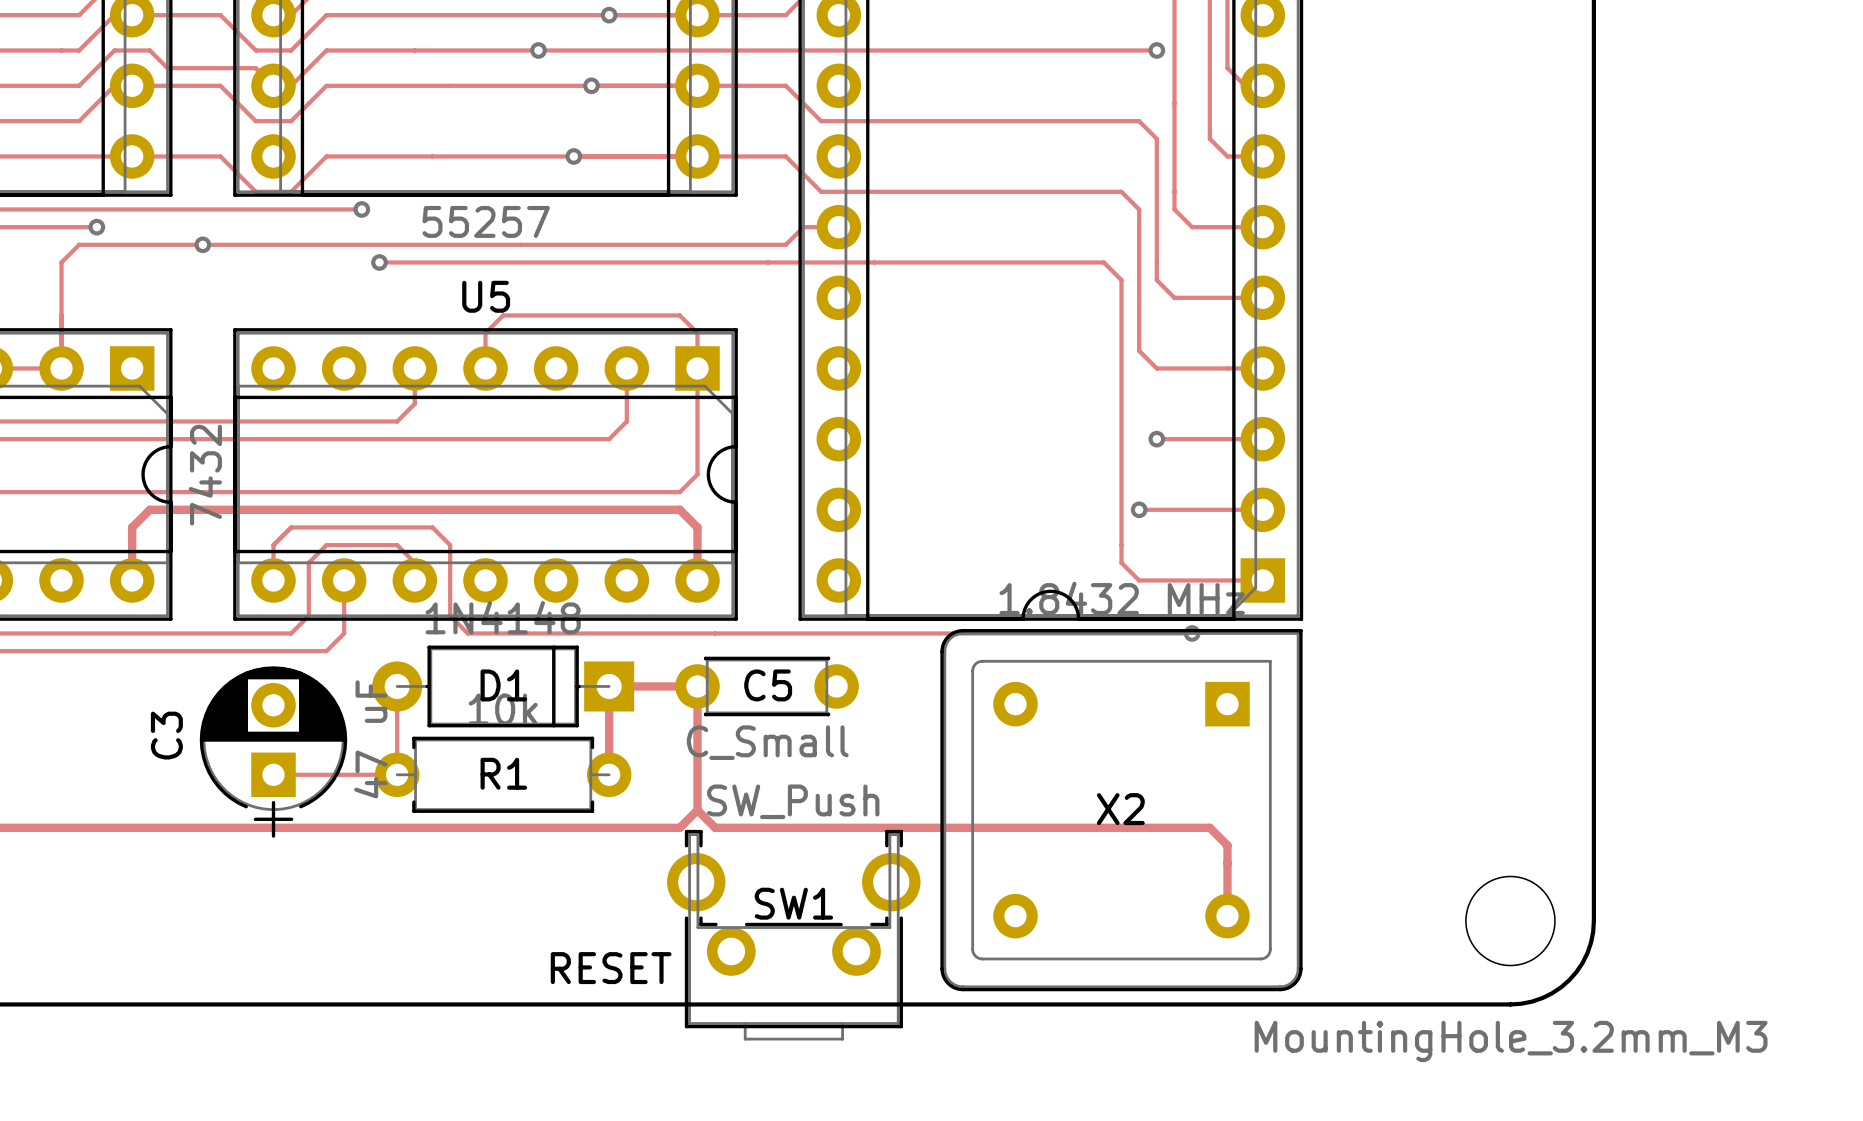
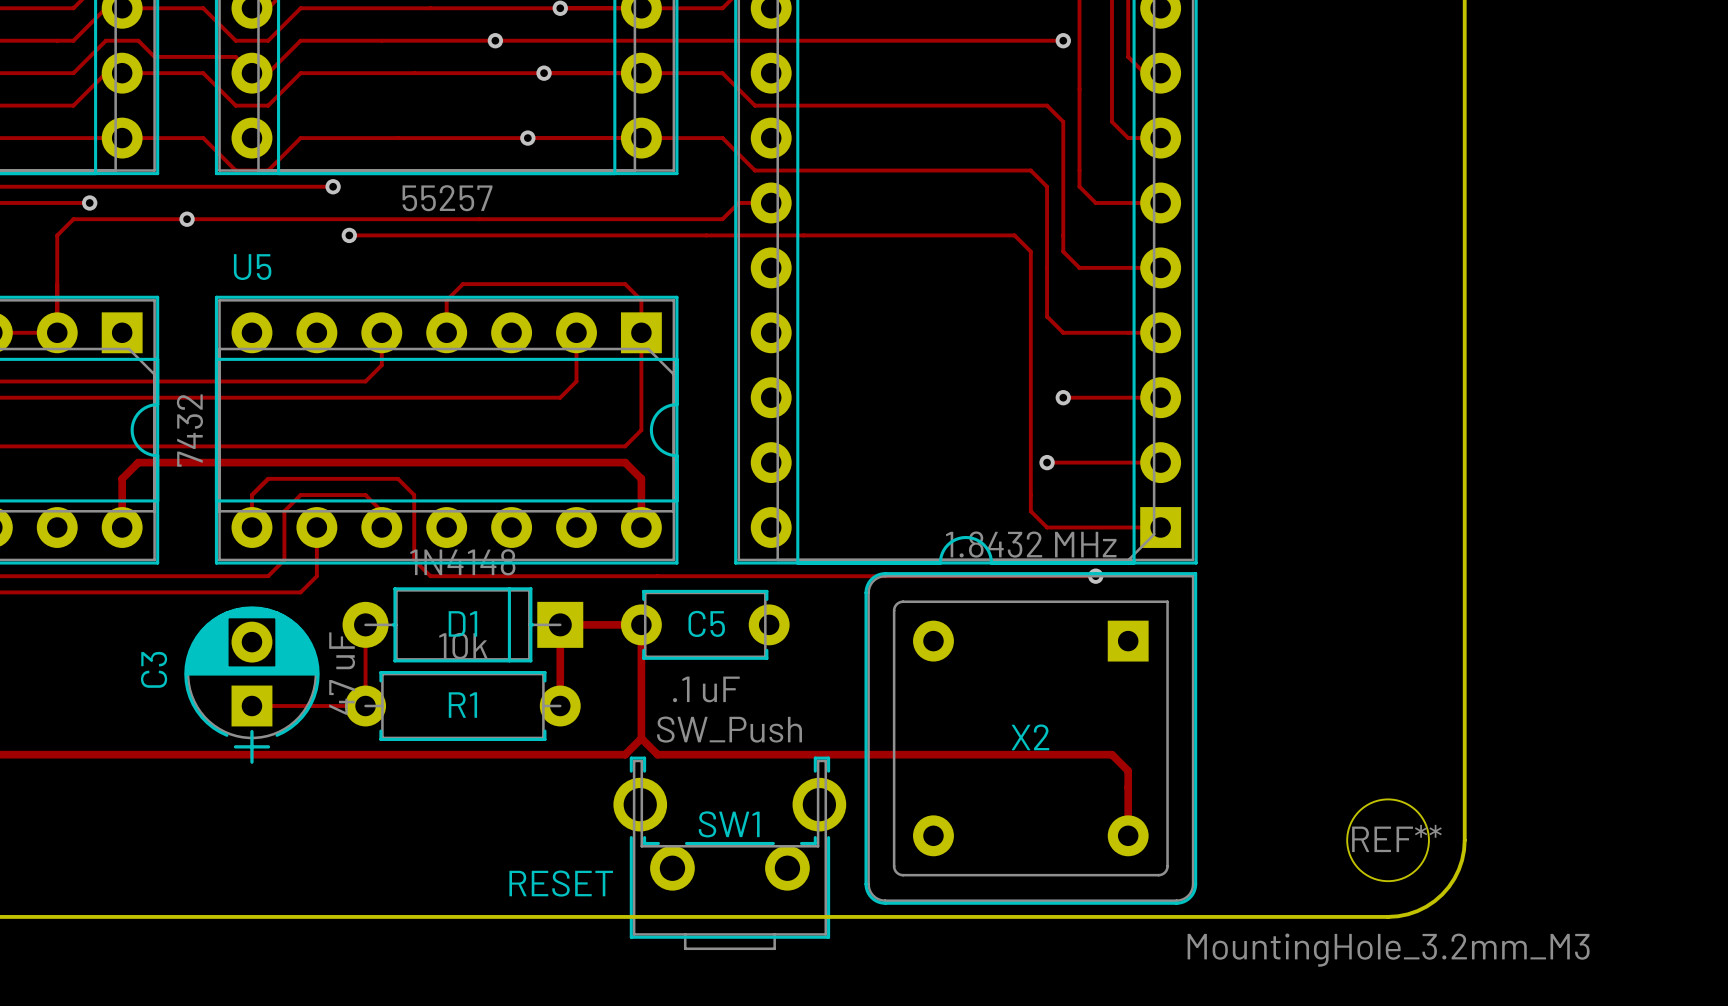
U5 name position: U5 (486, 296) -> U5 (252, 267)
C5 footprint: [675, 656, 859, 717] -> [620, 589, 790, 660]
C5 value: C_Small (767, 742) -> .1 uF (706, 689)
REF** name: none -> REF** (1396, 838)

